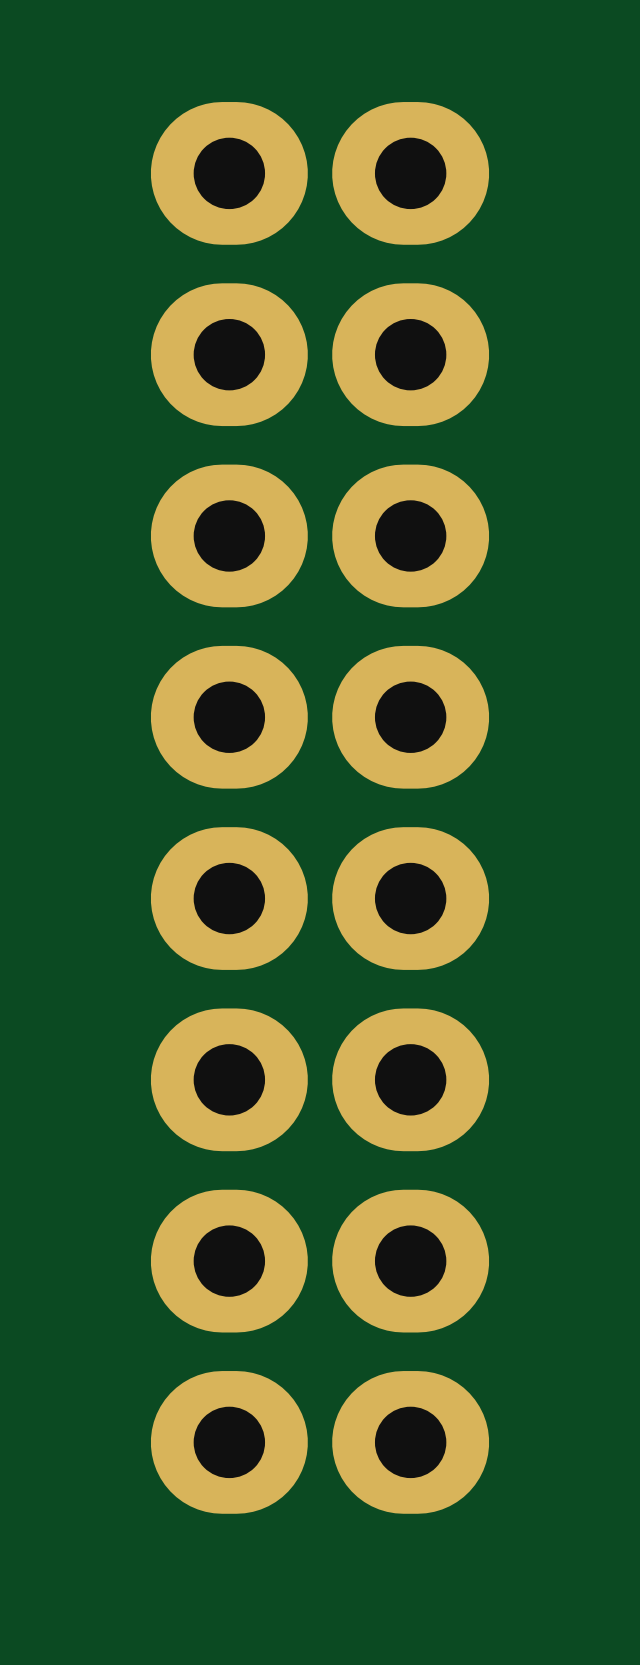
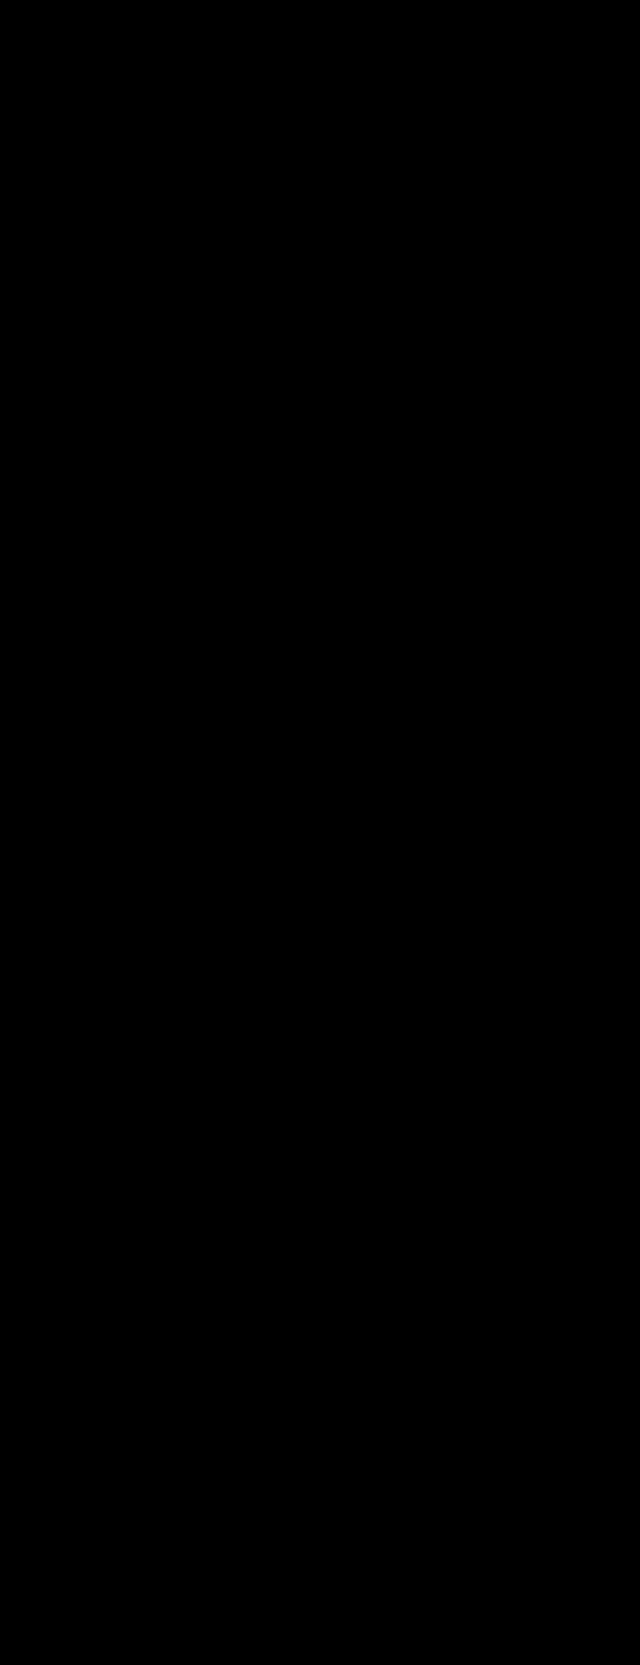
part: (320, 807) -> none

